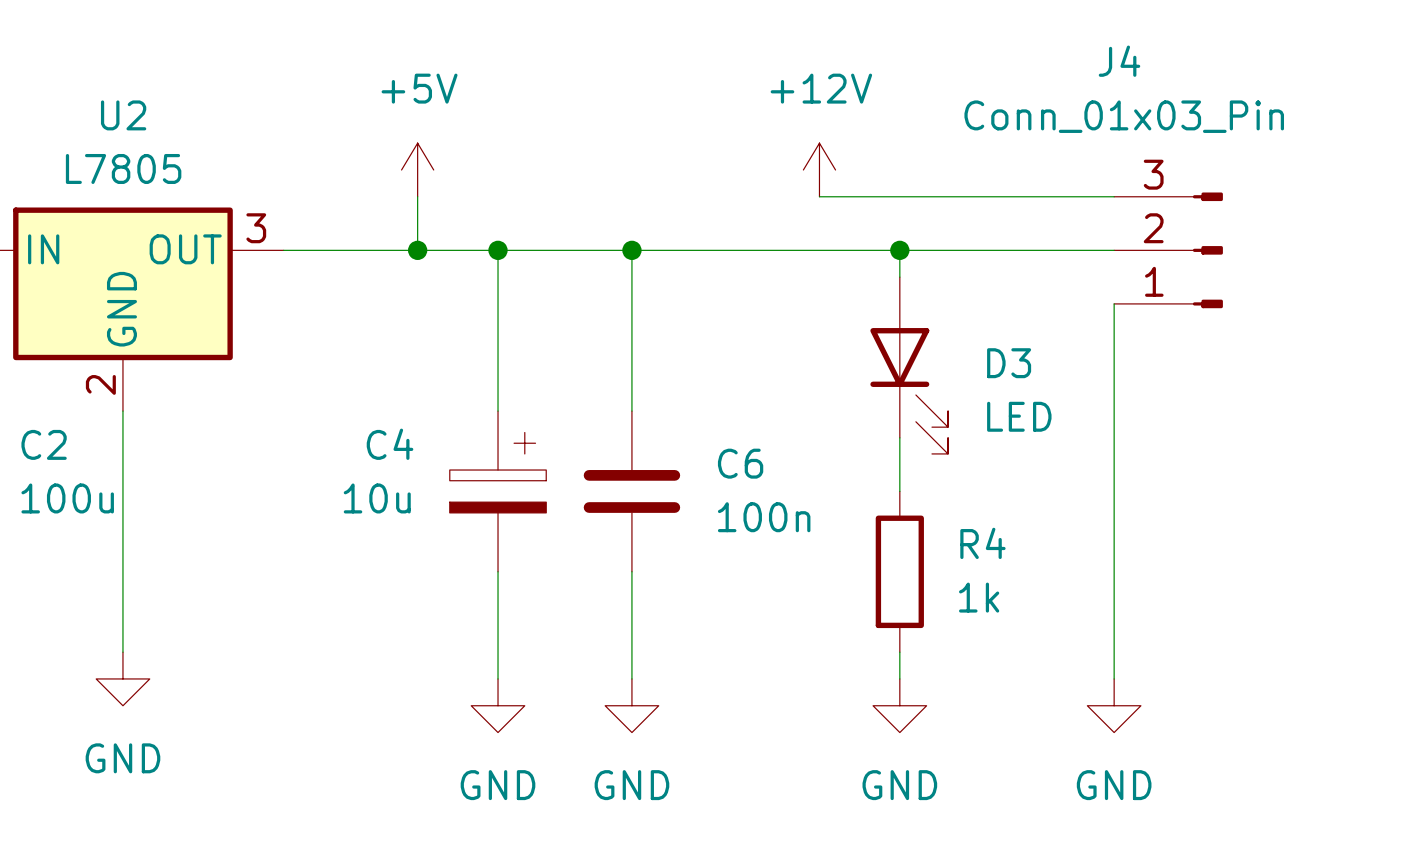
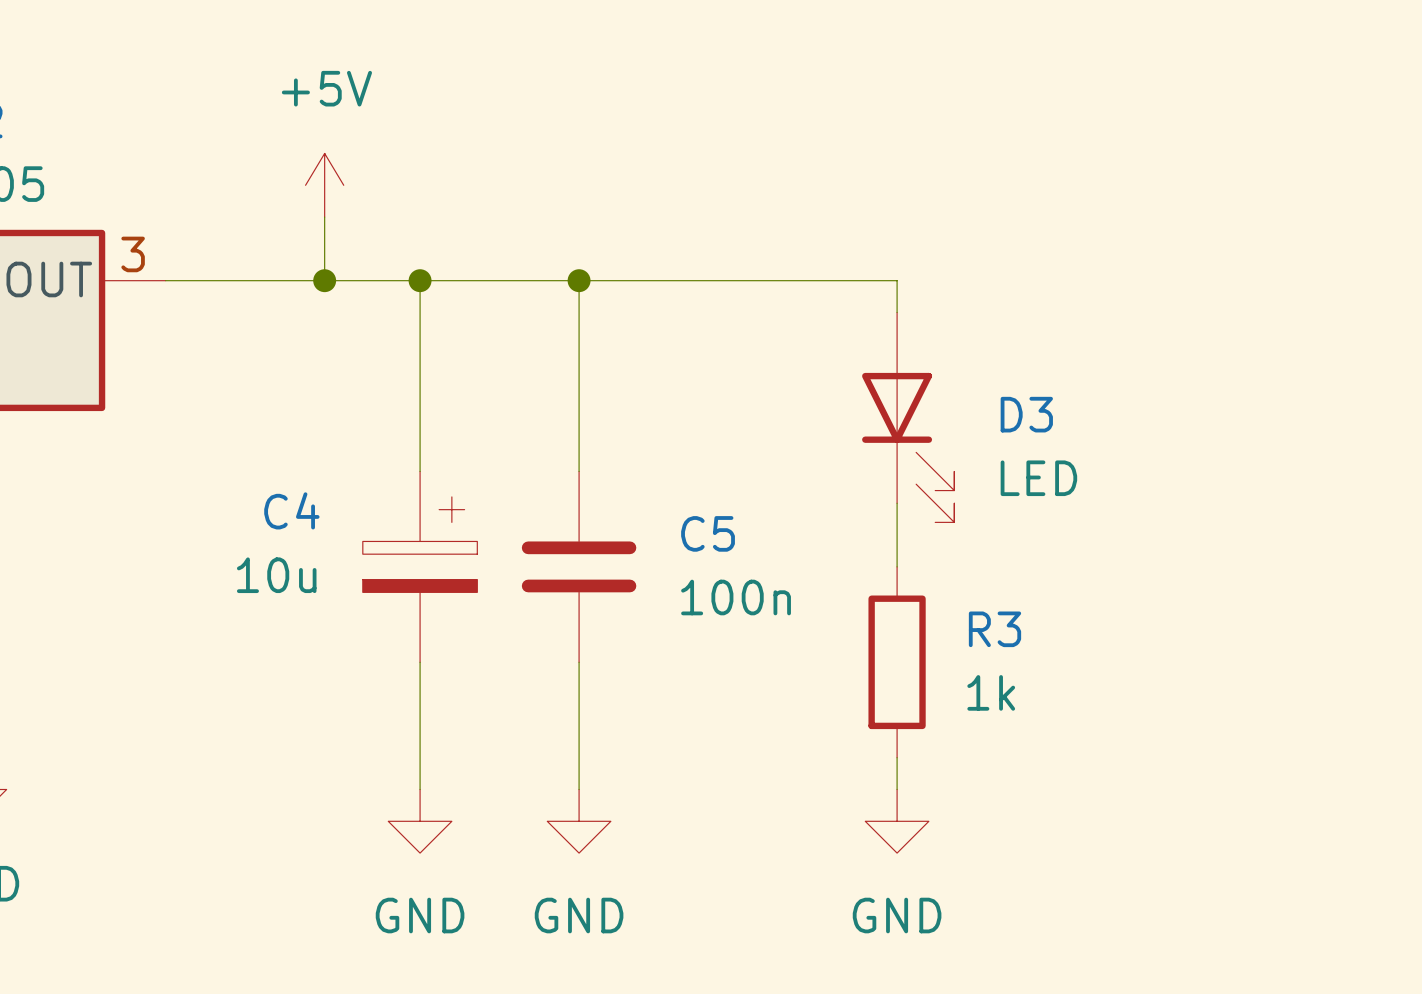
power symbol: +12V (819, 169) -> none
wire: (819, 196) (1114, 196) -> none
wire: (899, 250) (1114, 250) -> none
junction: (899, 250) -> none
J4: Conn_01x03_Pin (1168, 250) -> none
wire: (1114, 303) (1114, 678) -> none
C6 name: C6 (740, 463) -> C5 (708, 533)
R4 name: R4 (982, 543) -> R3 (994, 629)
power symbol: GND (1114, 705) -> none

